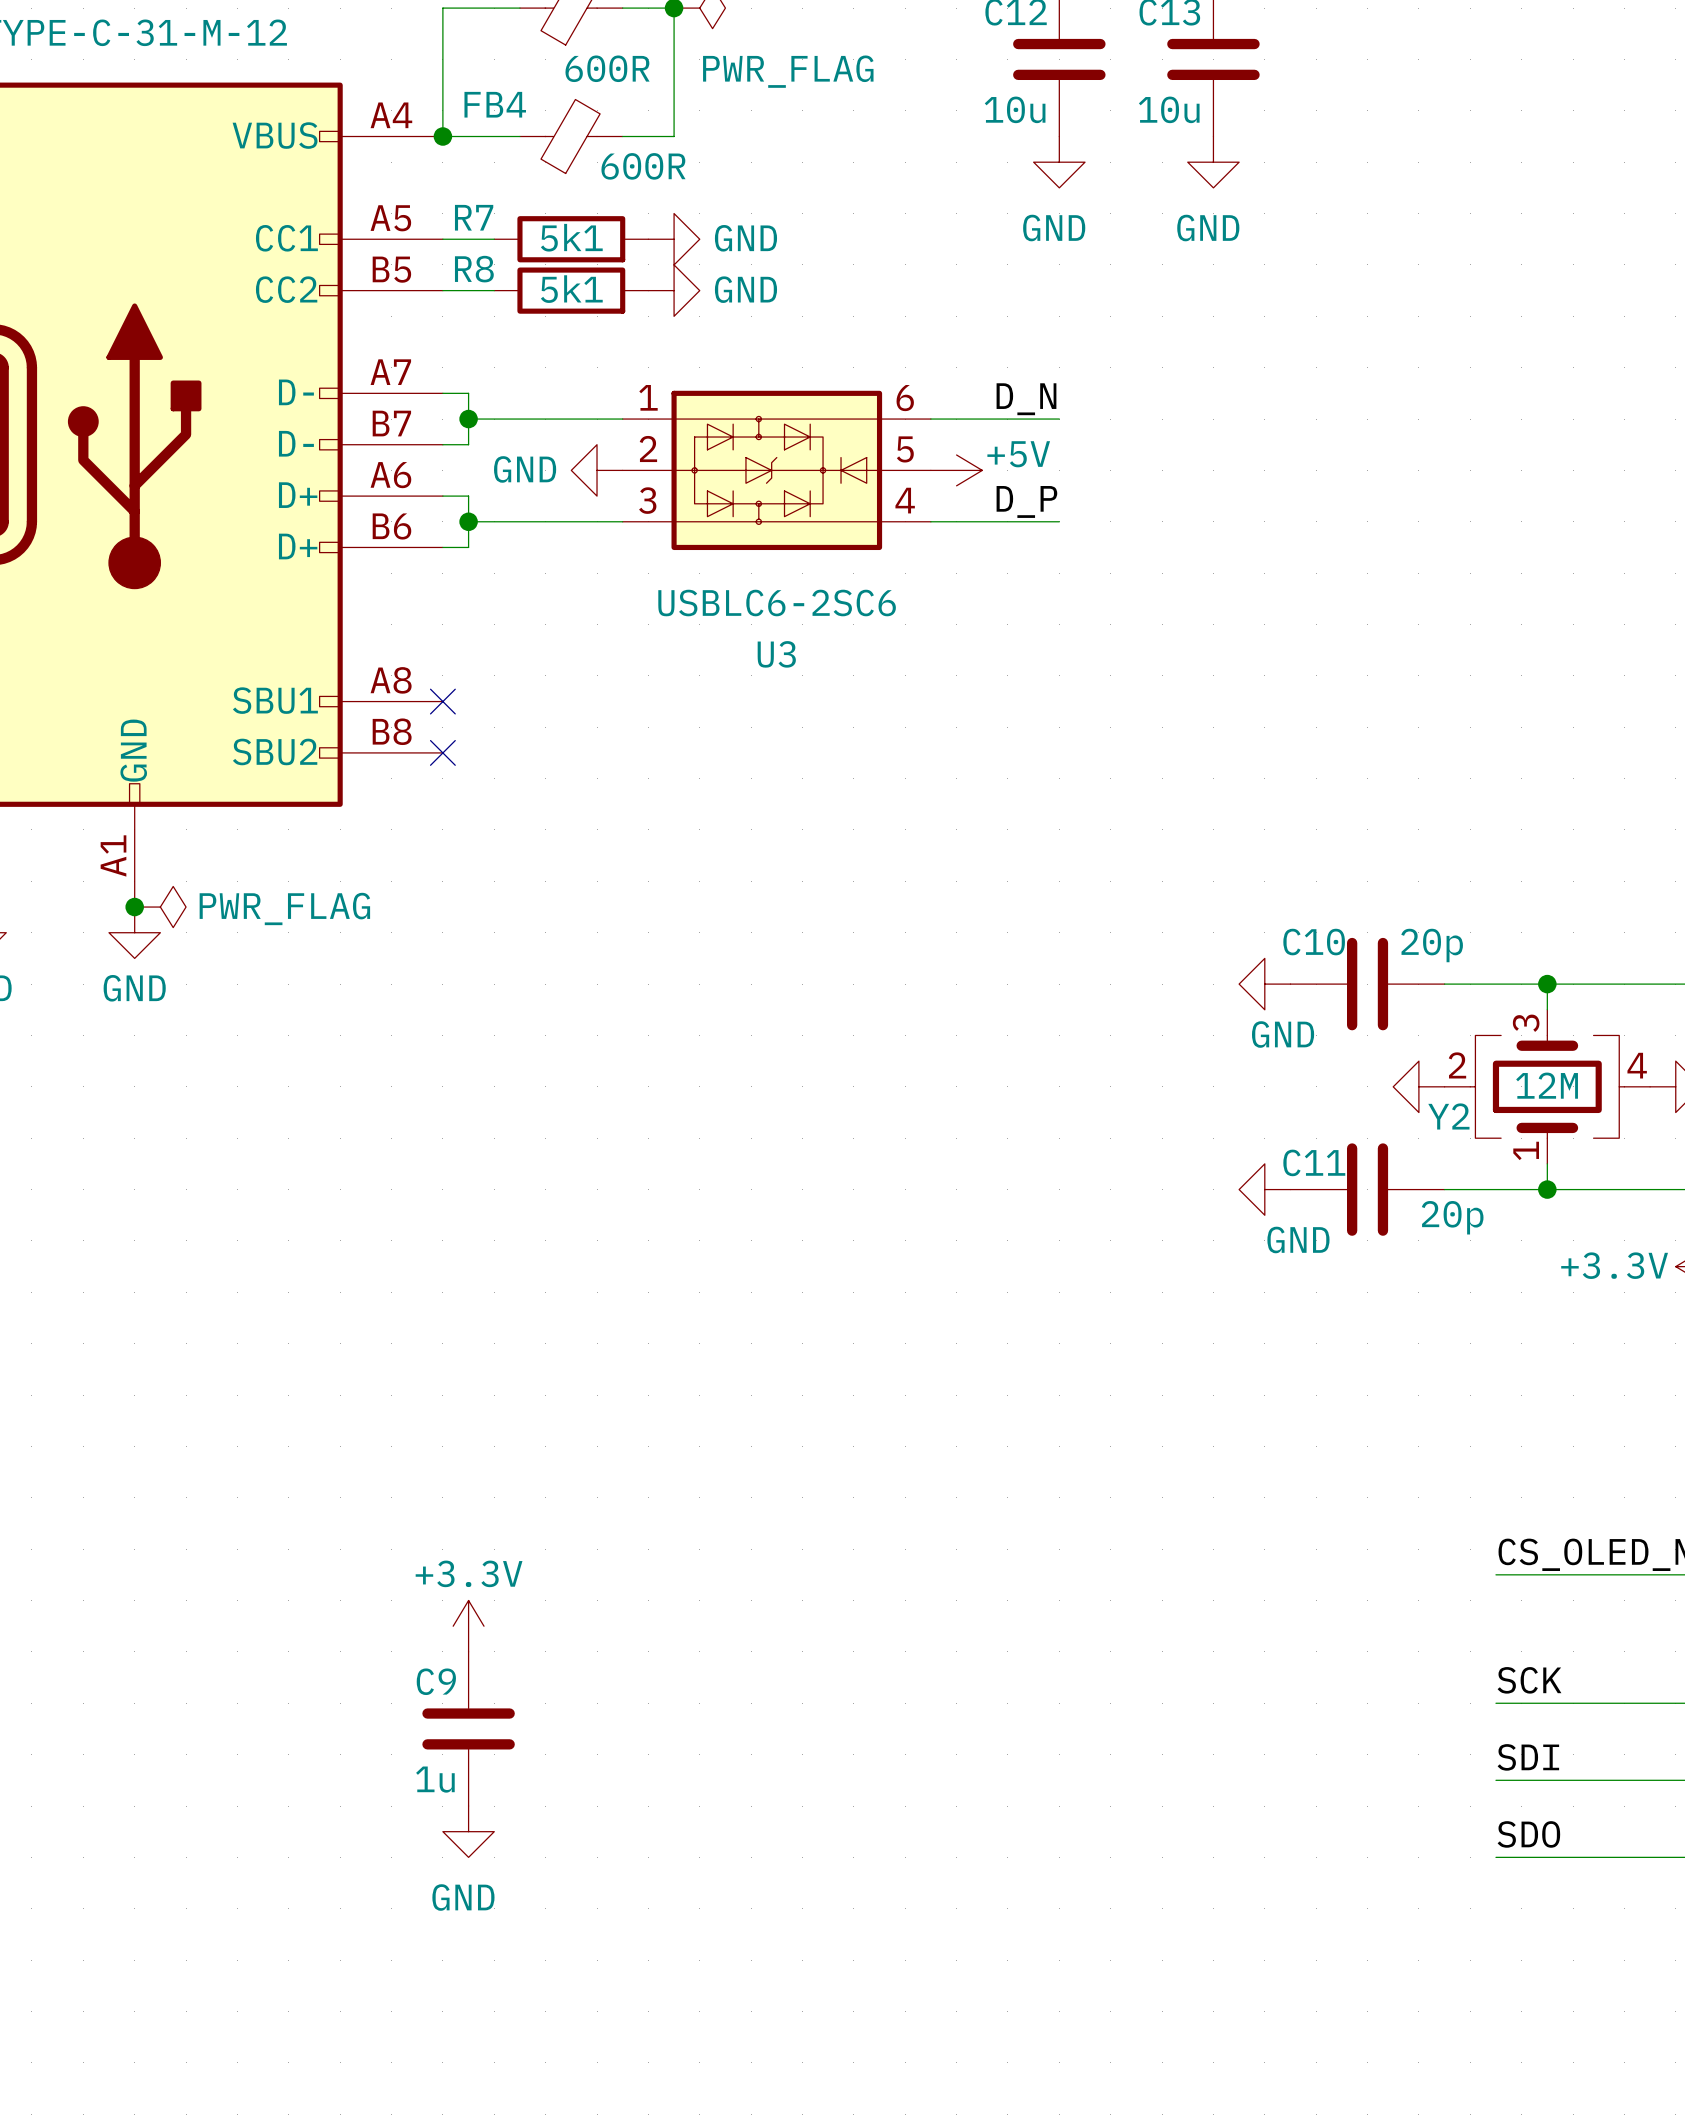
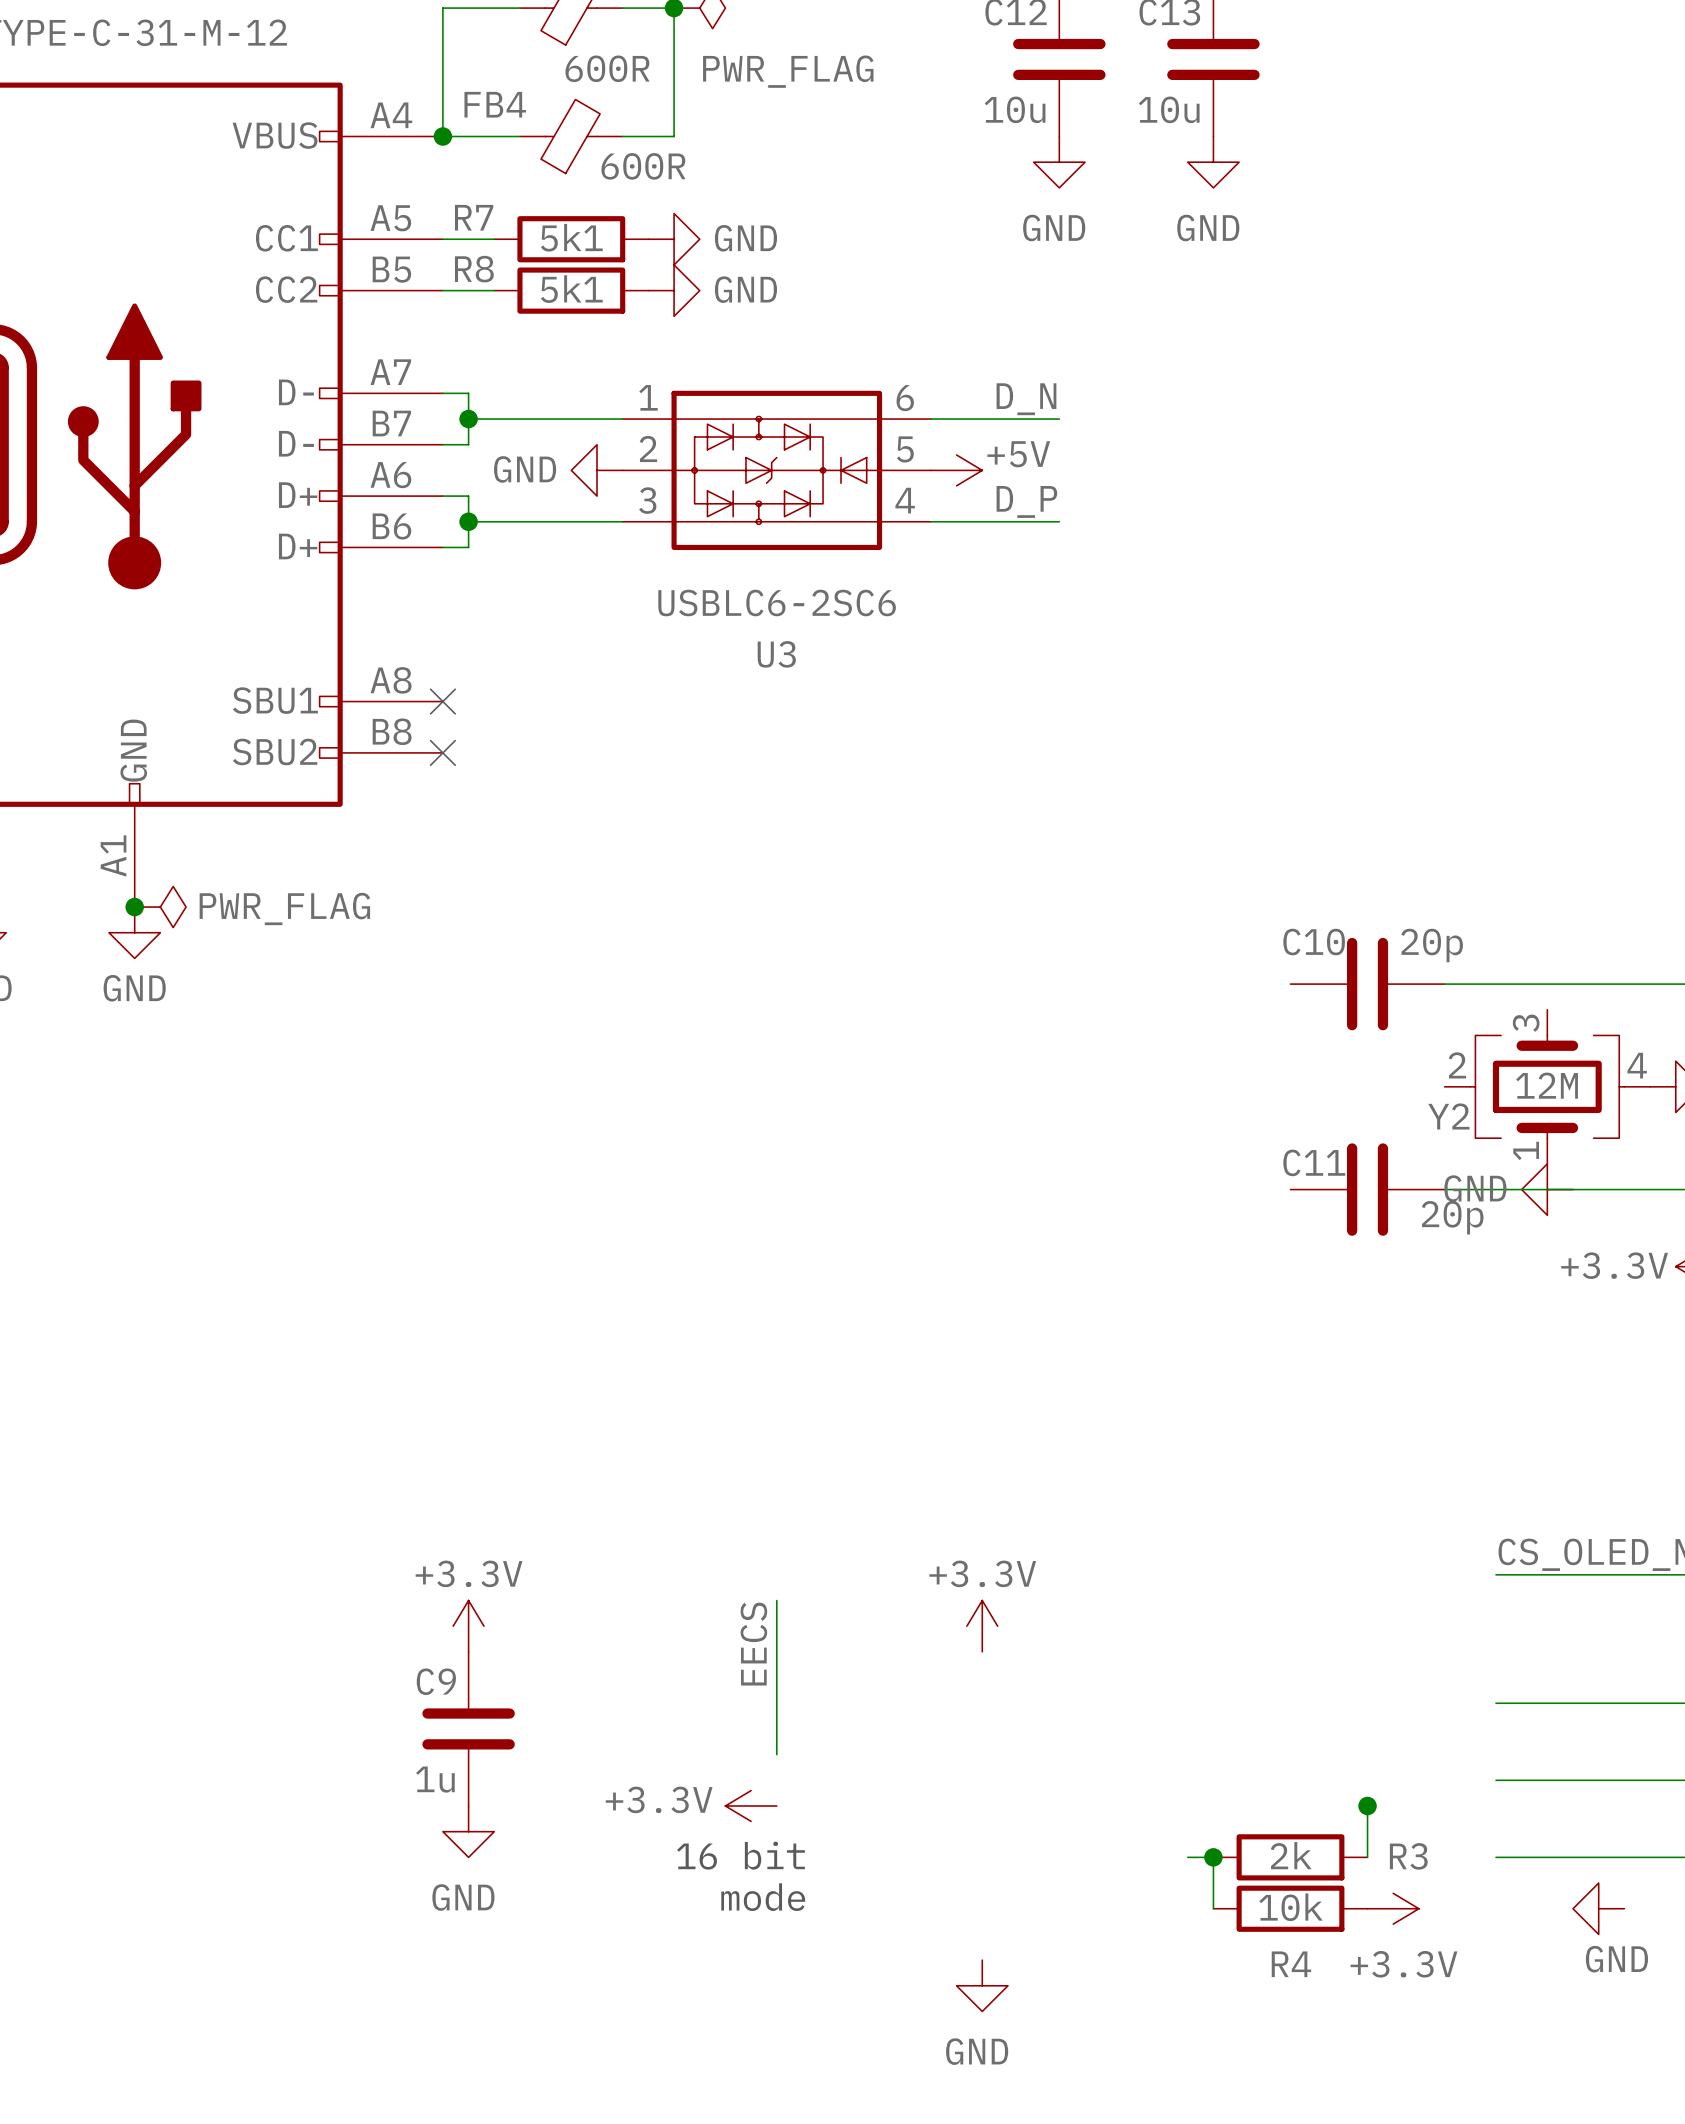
power symbol: GND (1264, 984) -> none
wire: (1547, 984) (1547, 1009) -> none
junction: (1547, 984) -> none
power symbol: (1418, 1086) -> none
power symbol: GND (1264, 1189) -> none
junction: (1547, 1189) -> none
power symbol: none -> GND (1547, 1189)
wire: none -> (776, 1600) (776, 1754)
power symbol: none -> +3.3V (982, 1626)
label: none -> EECS (753, 1644)
label: SCK (1529, 1680) -> none
label: SDI (1528, 1757) -> none
power symbol: none -> +3.3V (751, 1806)
wire: none -> (1367, 1806) (1367, 1857)
junction: none -> (1367, 1806)
label: SDO (1528, 1834) -> none
text: none -> 16 bit (740, 1855)
wire: none -> (1187, 1857) (1213, 1857) (1213, 1908)
junction: none -> (1213, 1857)
R3: none -> 2k (1290, 1857)
text: none -> mode (763, 1897)
R4: none -> 10k (1290, 1908)
power symbol: none -> +3.3V (1393, 1908)
power symbol: none -> GND (1598, 1908)
power symbol: none -> GND (982, 1985)

